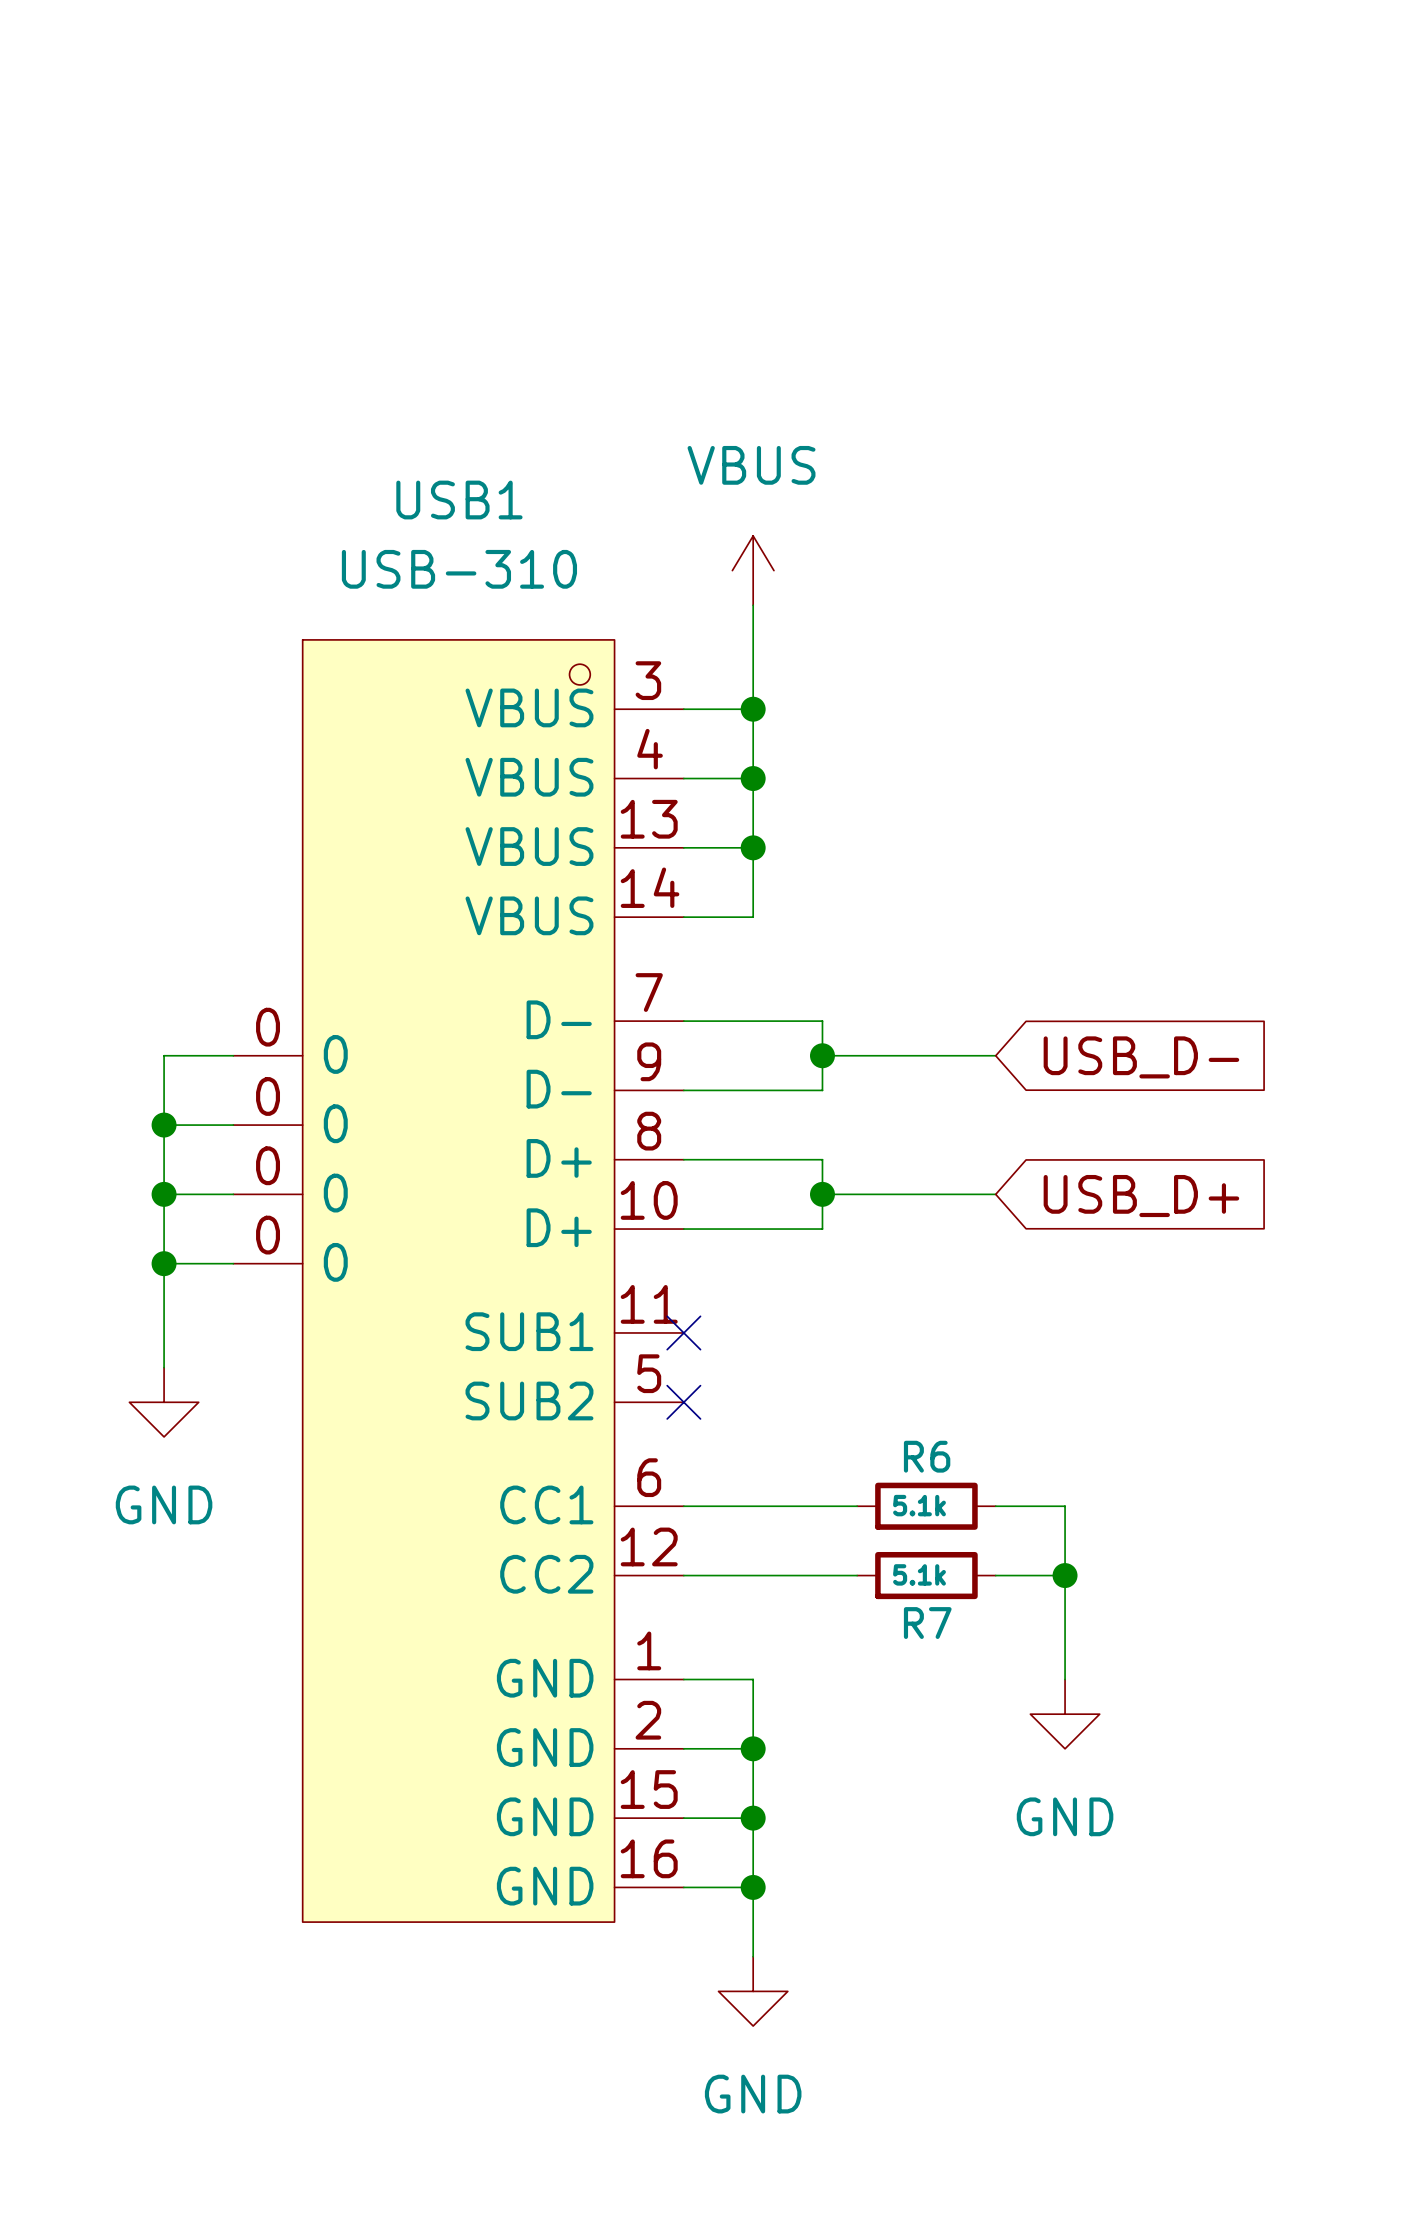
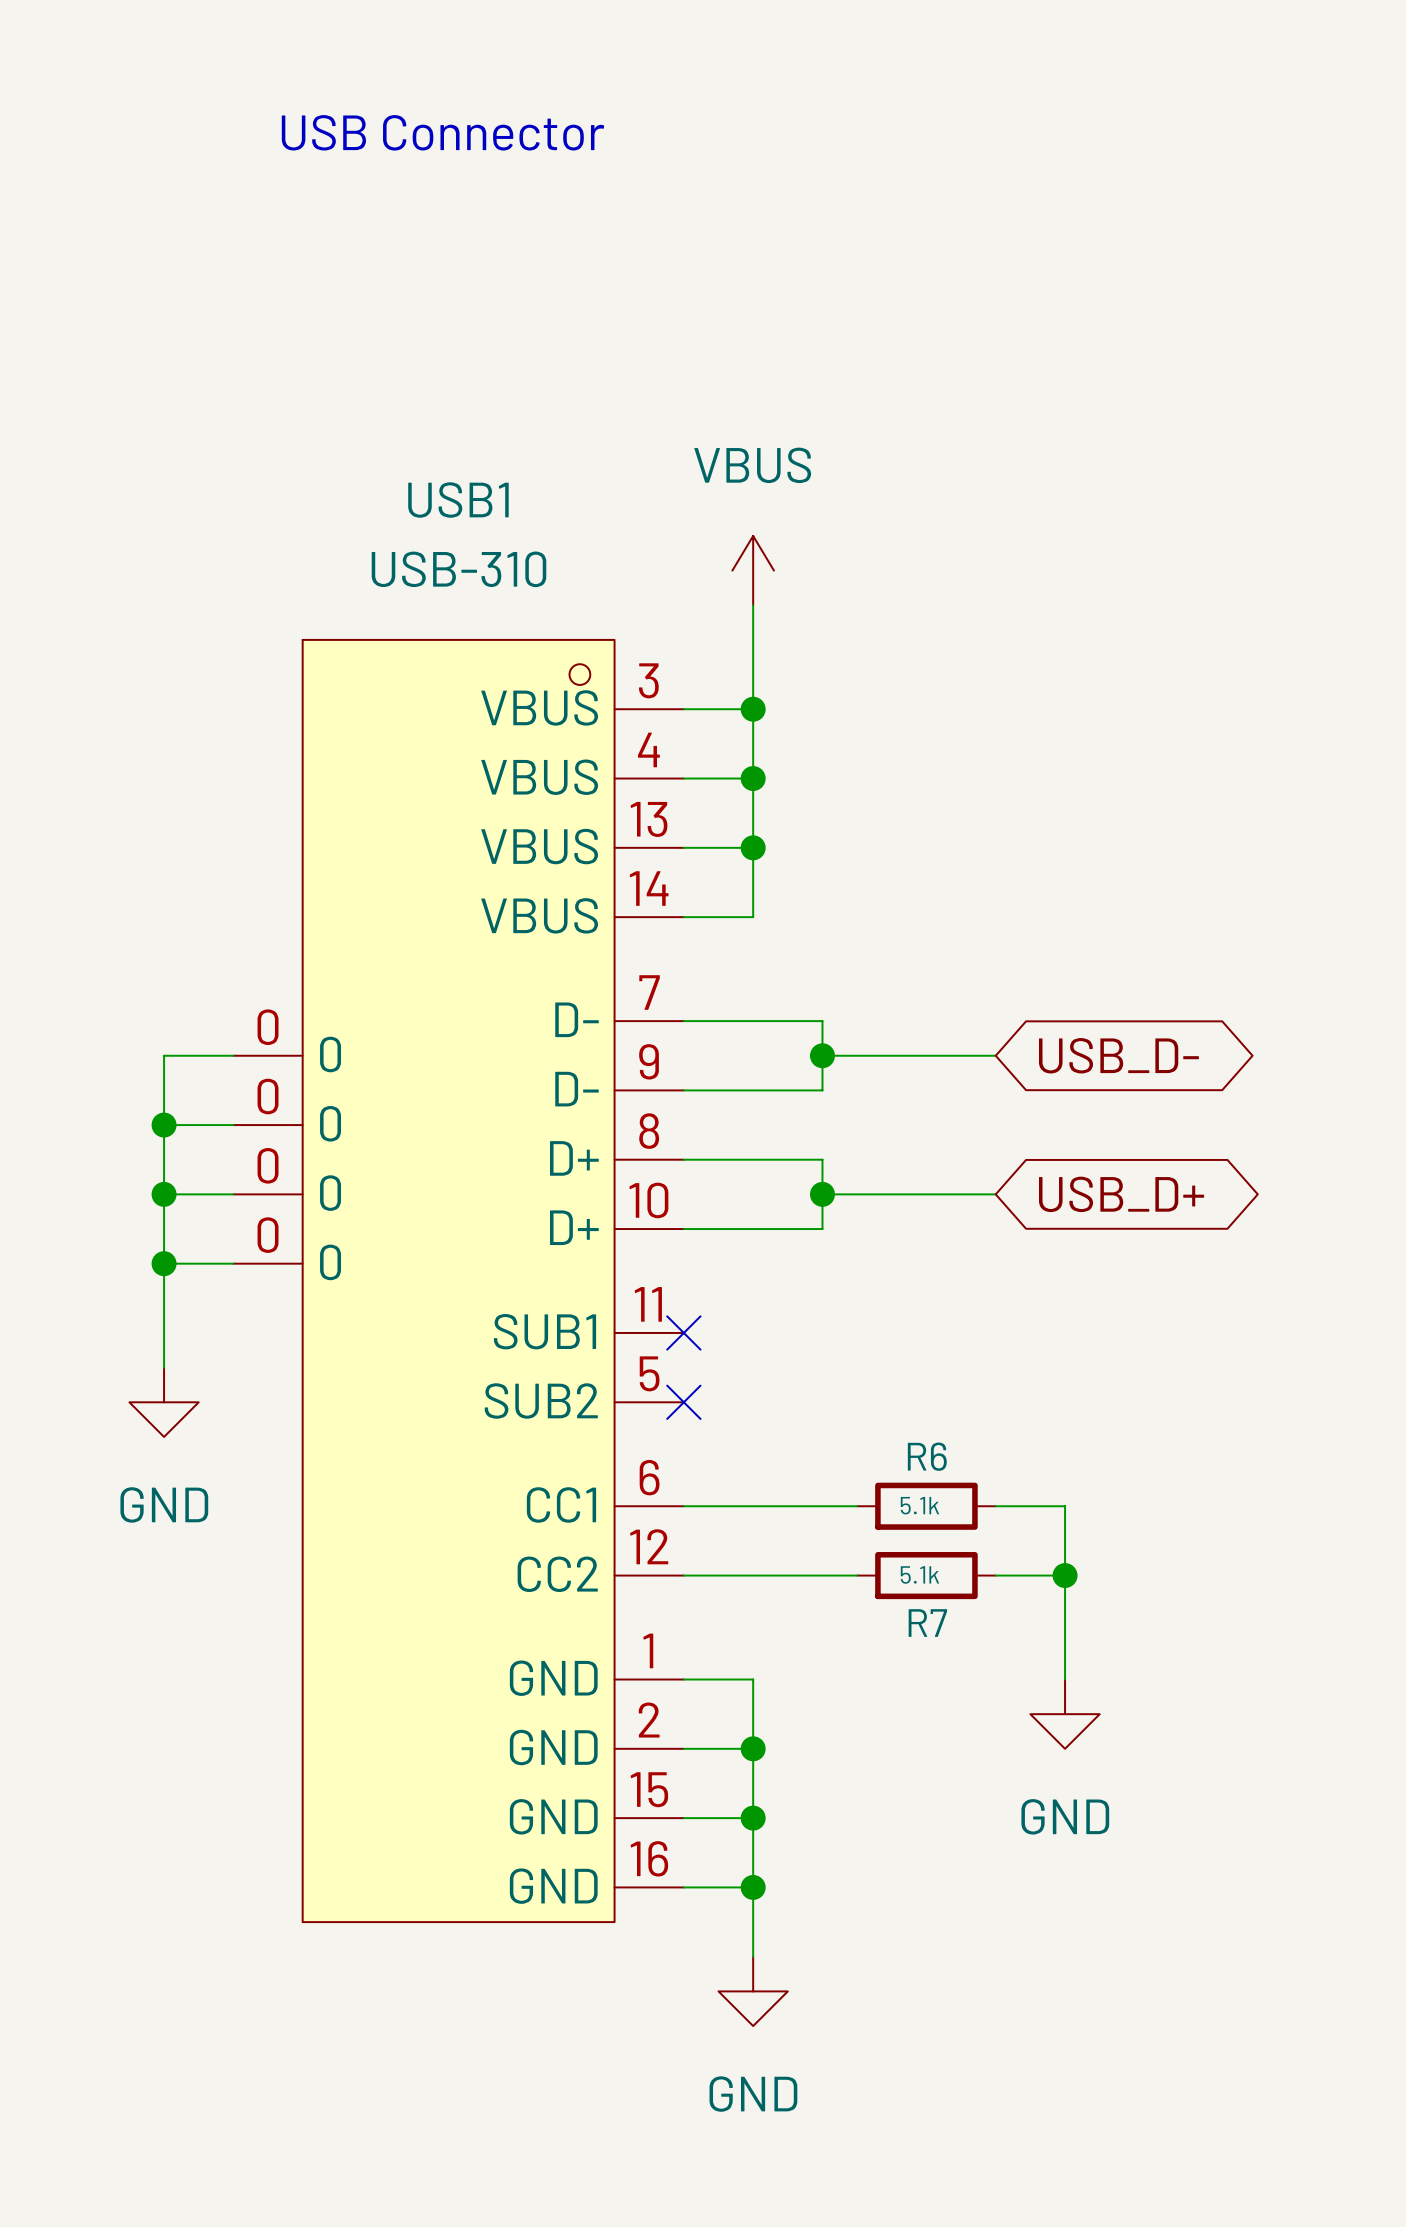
text: none -> USB Connector (443, 132)
global label shape: input (1141, 1057) -> bidirectional (1118, 1055)
global label shape: input (1141, 1196) -> bidirectional (1121, 1194)

